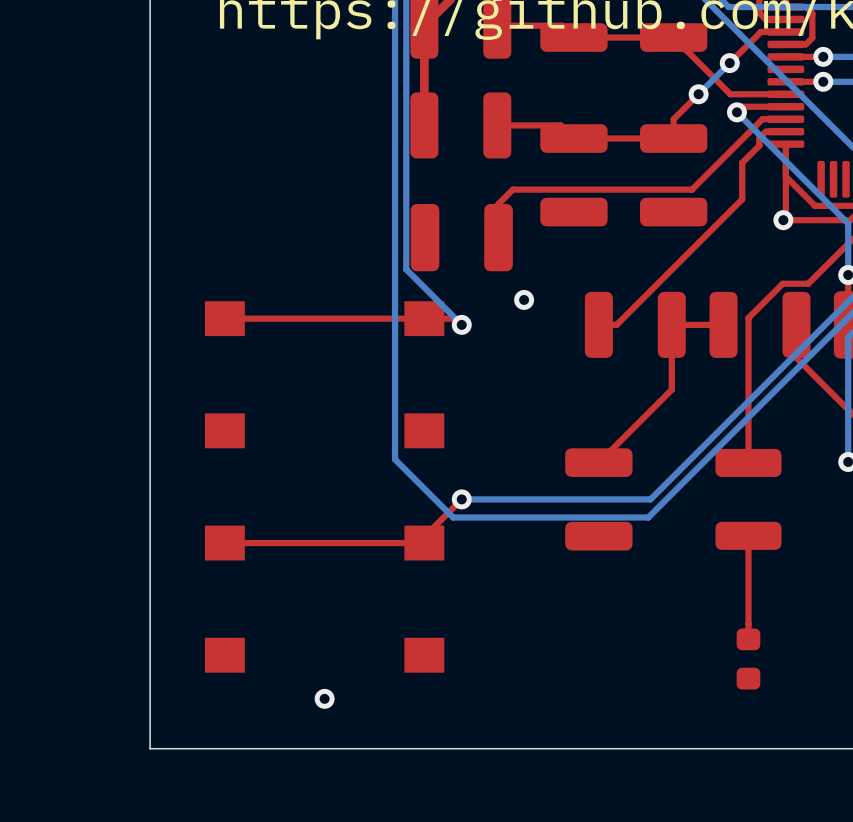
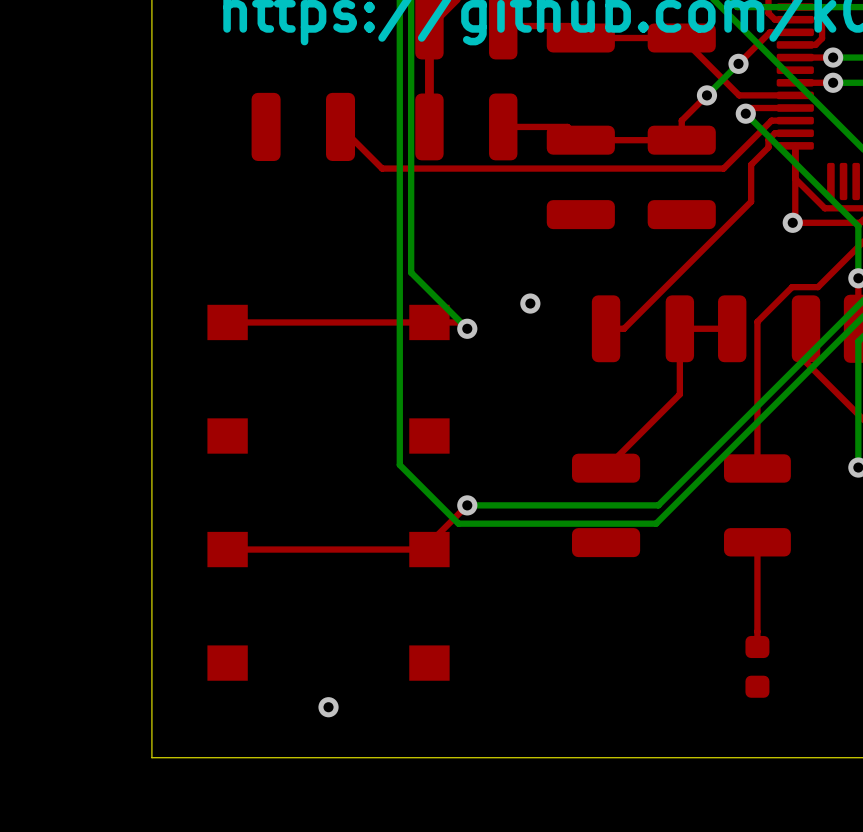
top track: (715, 166) (692, 189) (512, 189) (498, 203) (498, 237) -> (723, 168) (382, 168) (340, 126)
part position: (461, 237) -> (303, 126)

